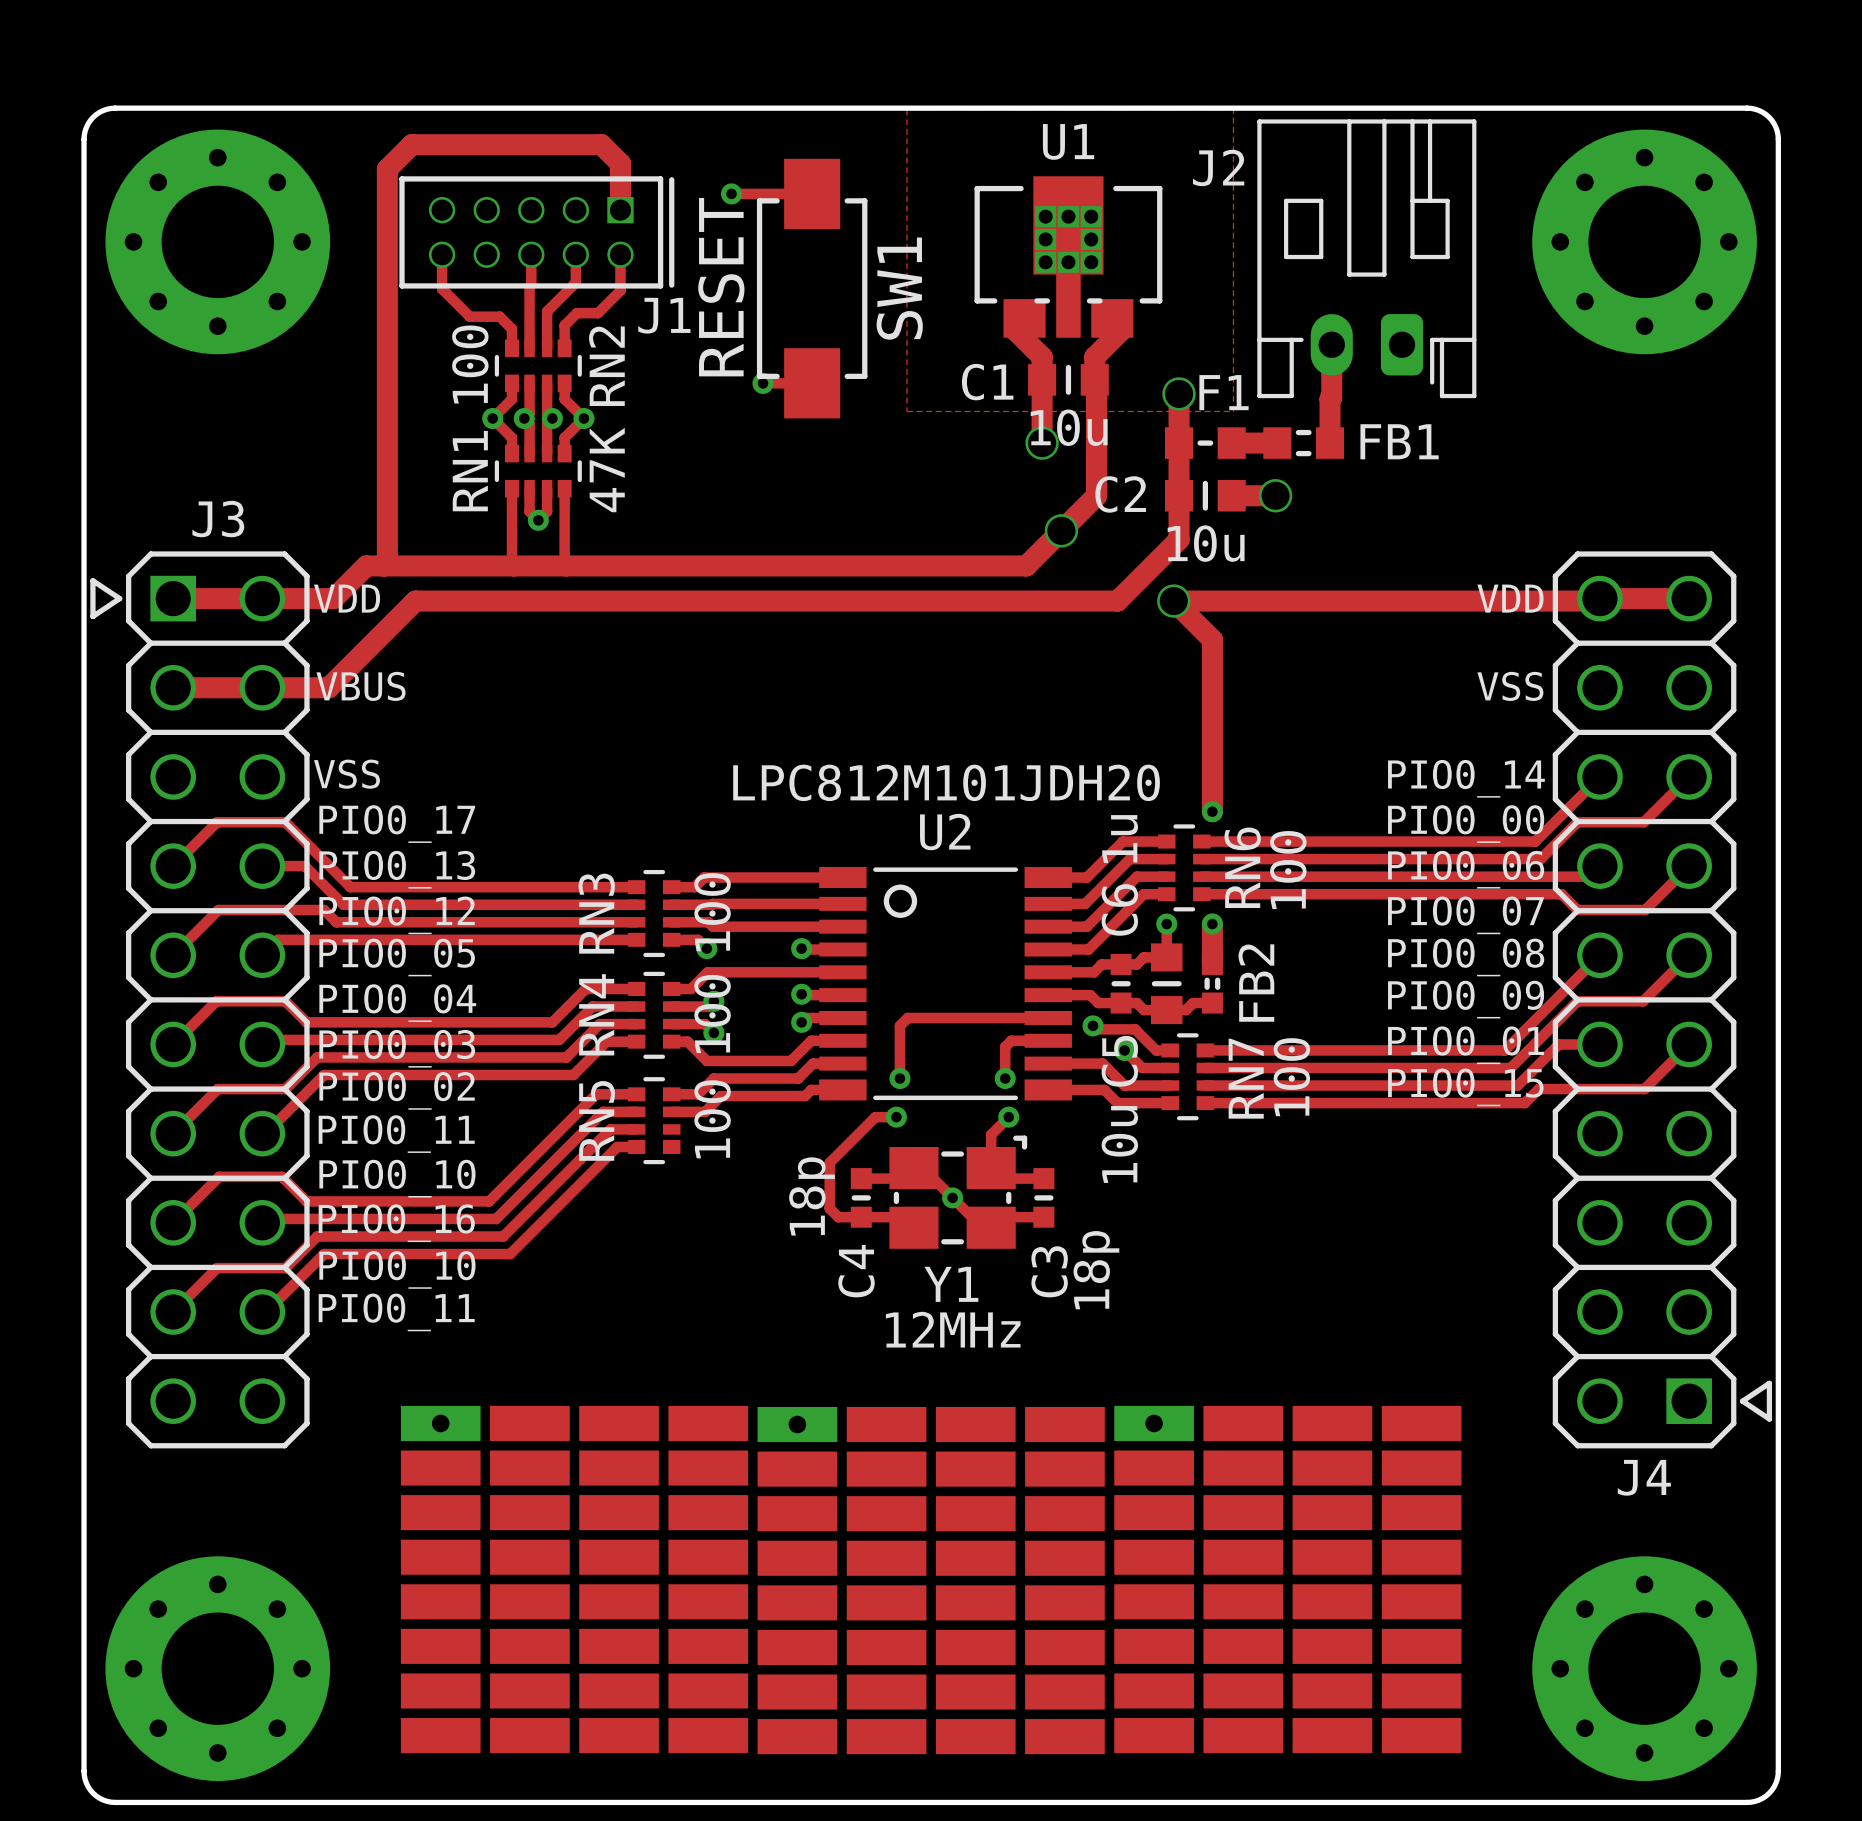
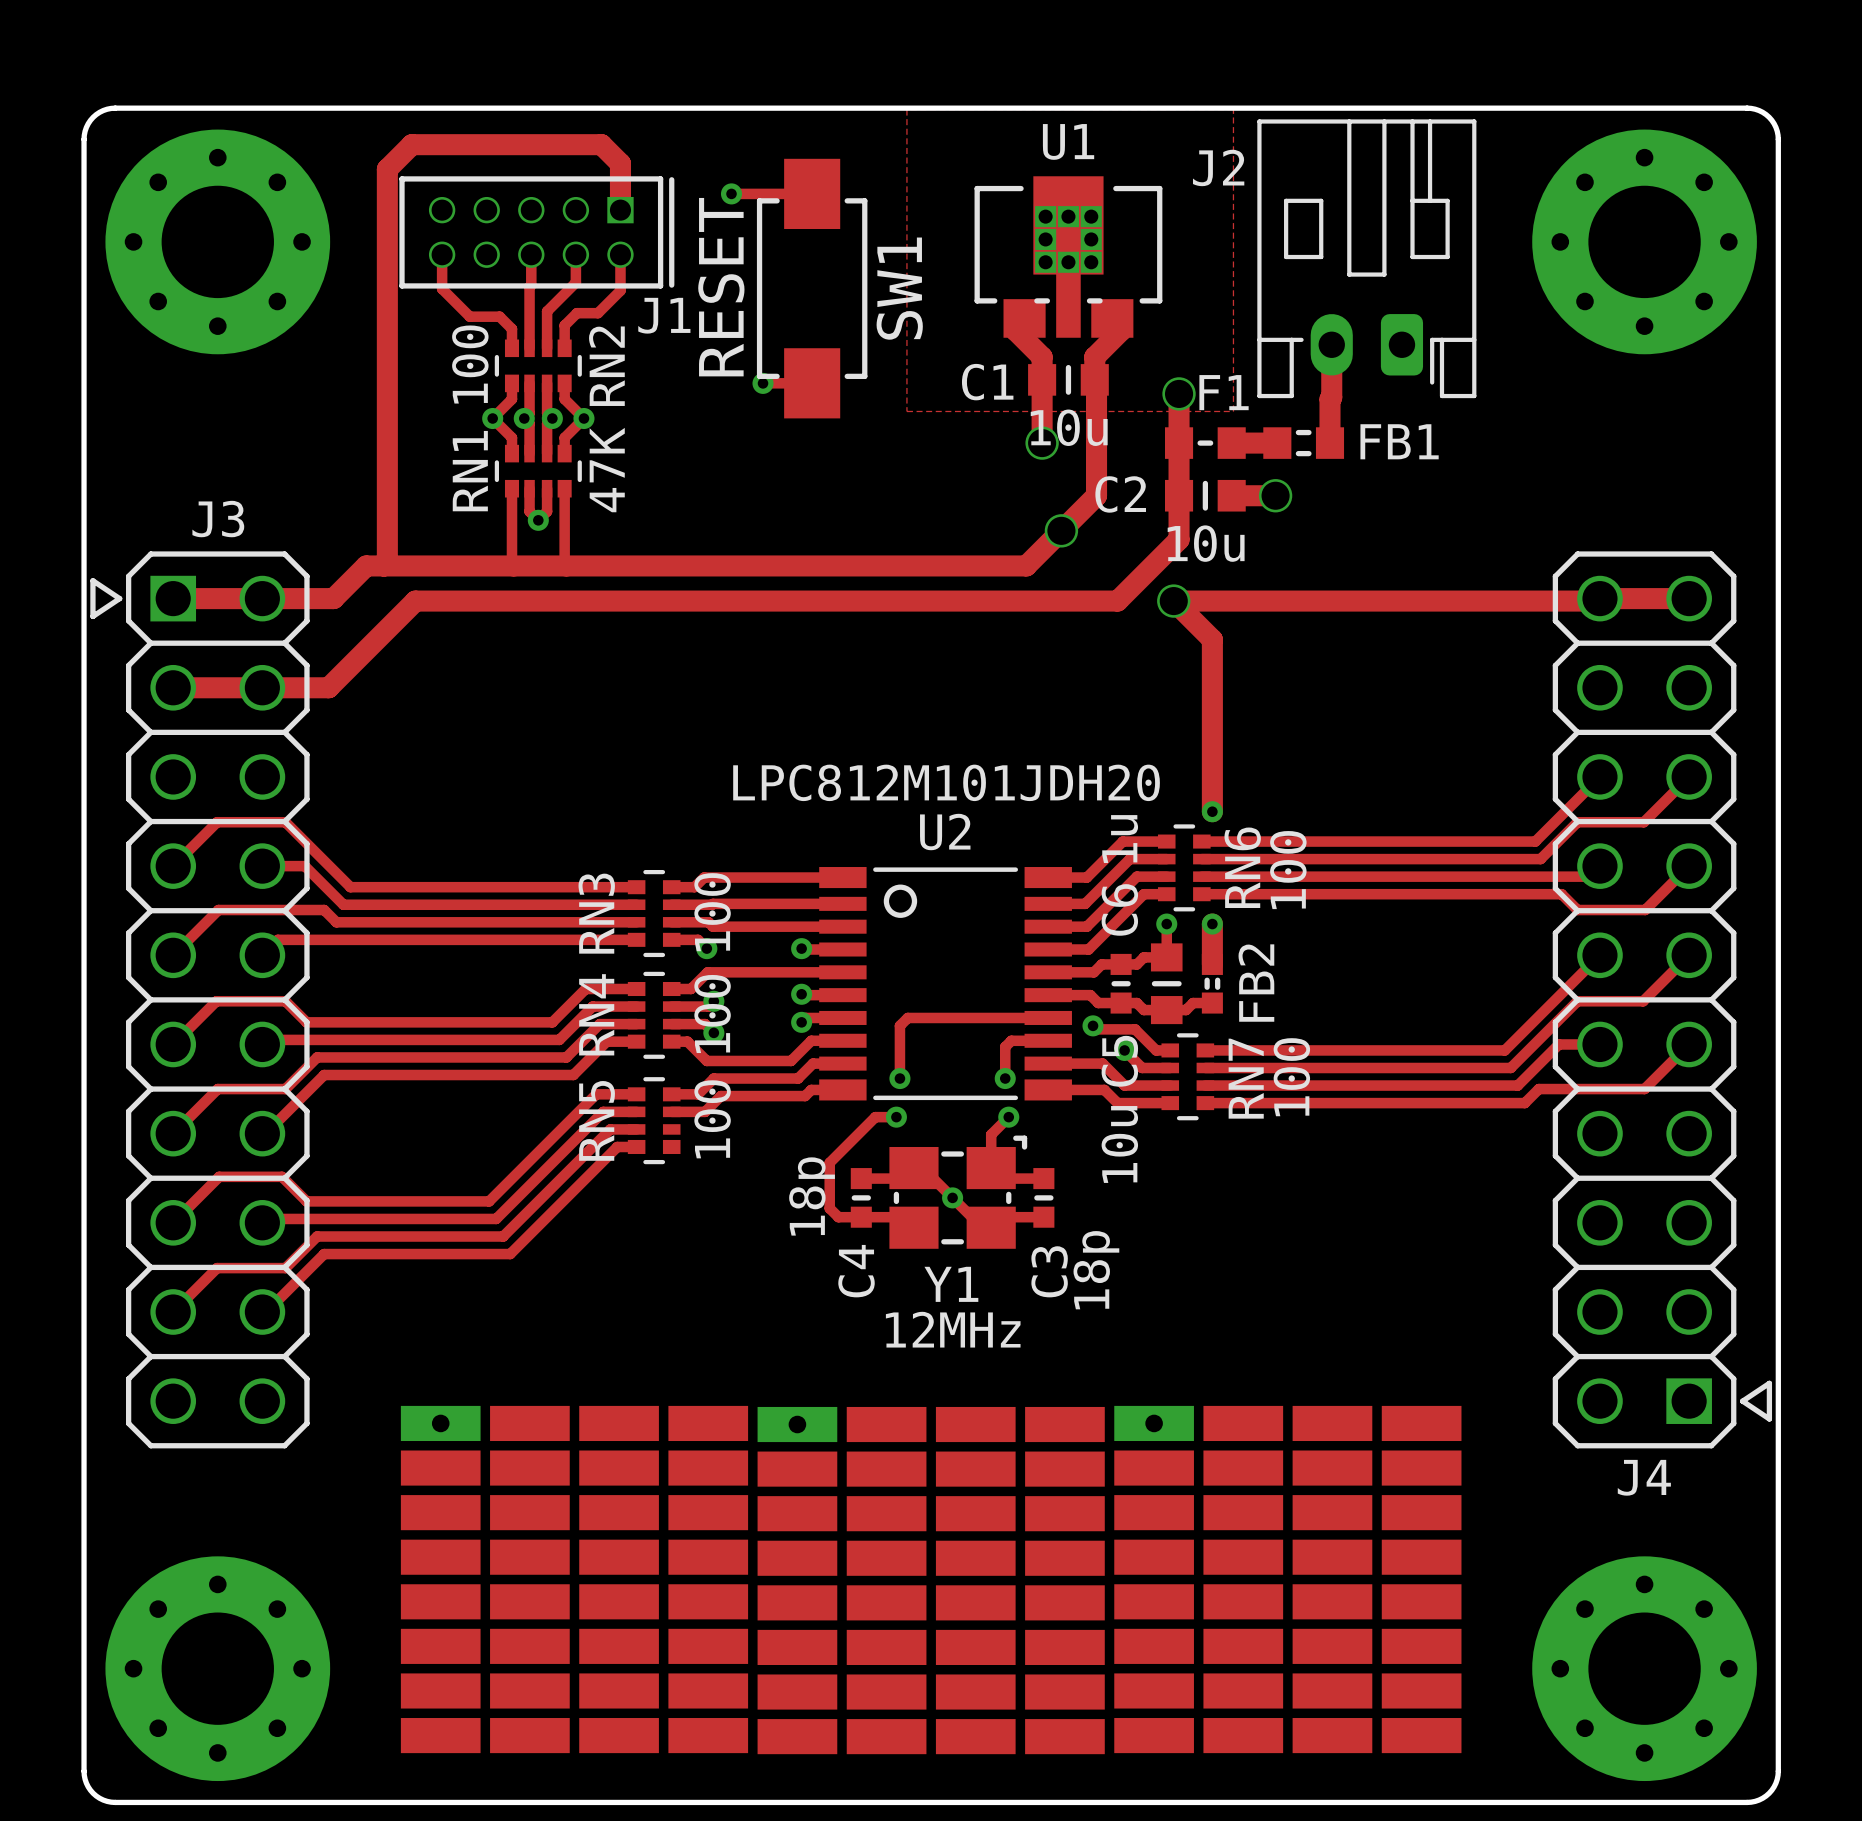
J3 footprint: [90, 551, 310, 1449] -> [90, 551, 310, 1449]
J4 footprint: [1552, 551, 1773, 1449] -> [1552, 551, 1773, 1449]

